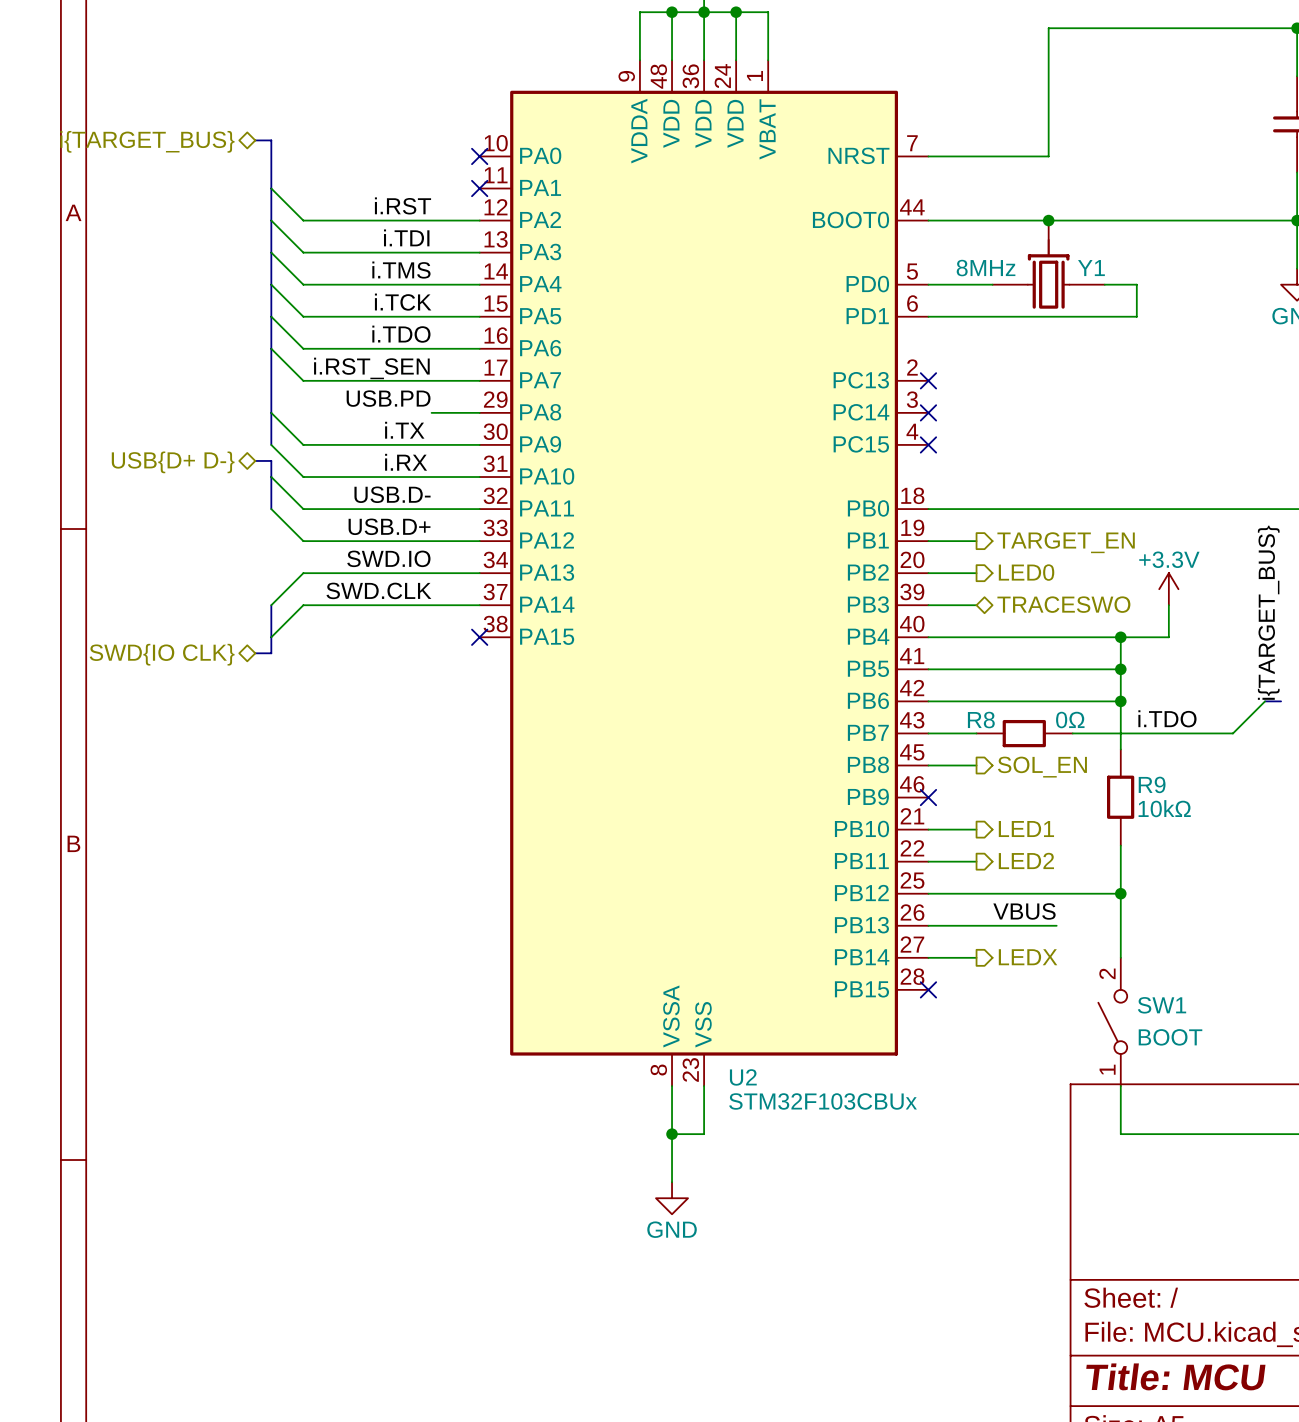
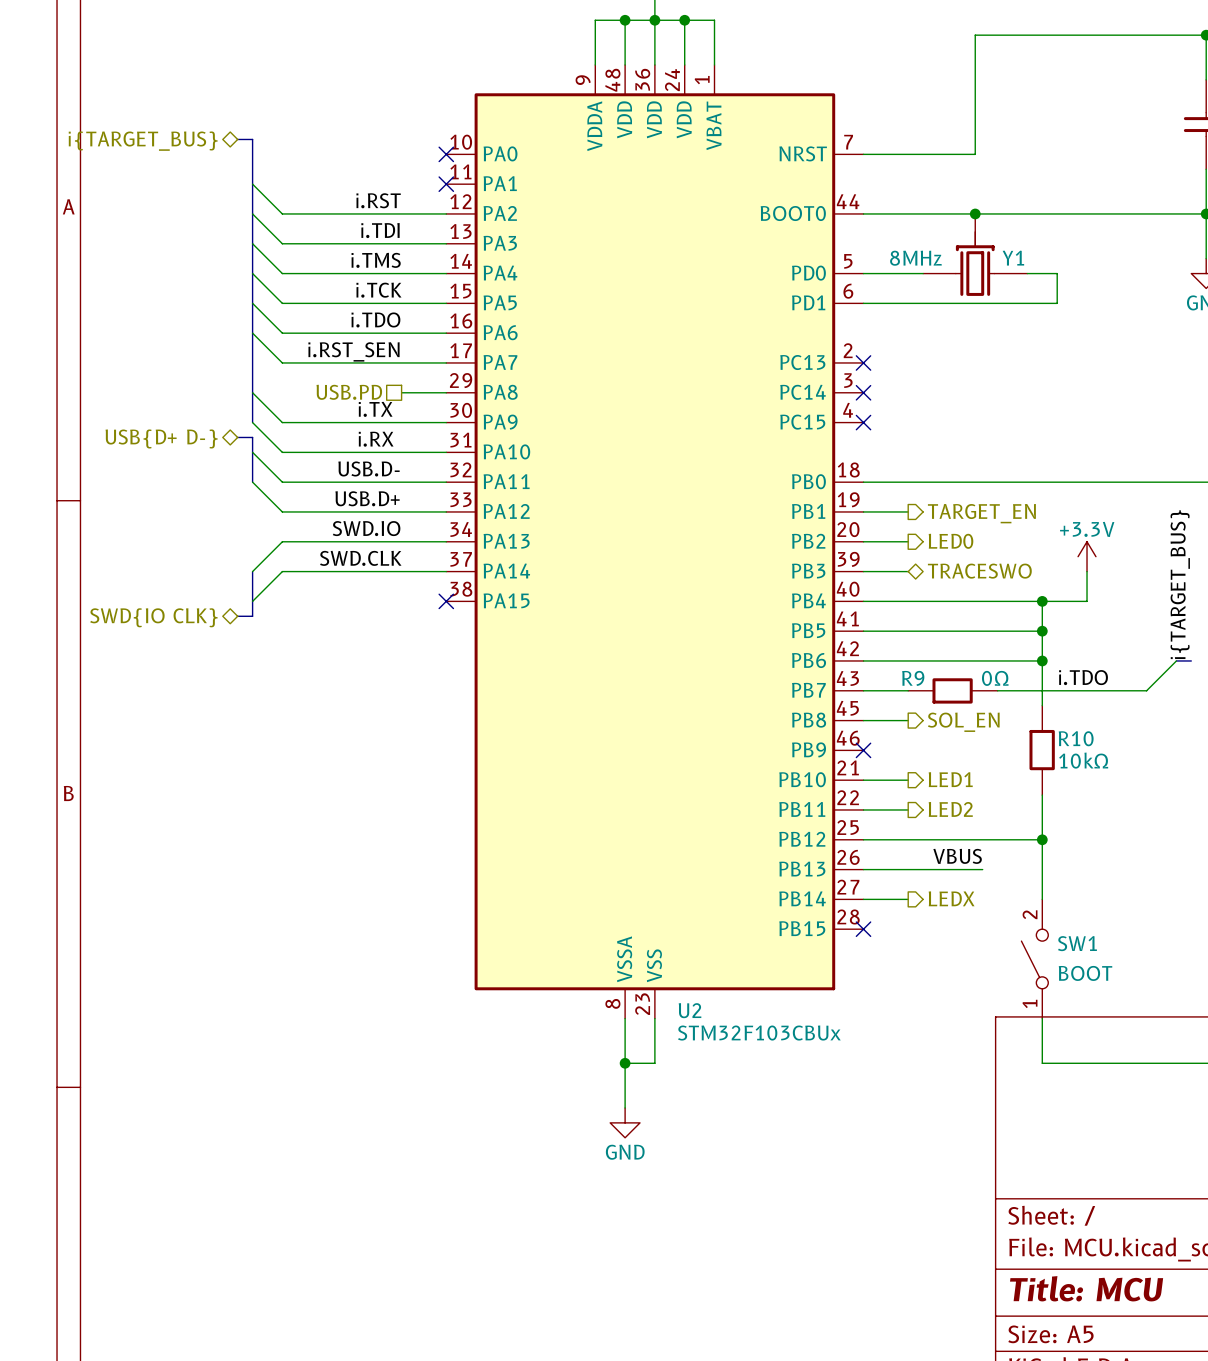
label: USB.PD (388, 398) -> none
hierarchical label: none -> USB.PD (349, 392)
R8 name: R8 (981, 720) -> R9 (913, 678)
R9 name: R9 (1152, 784) -> R10 (1076, 738)

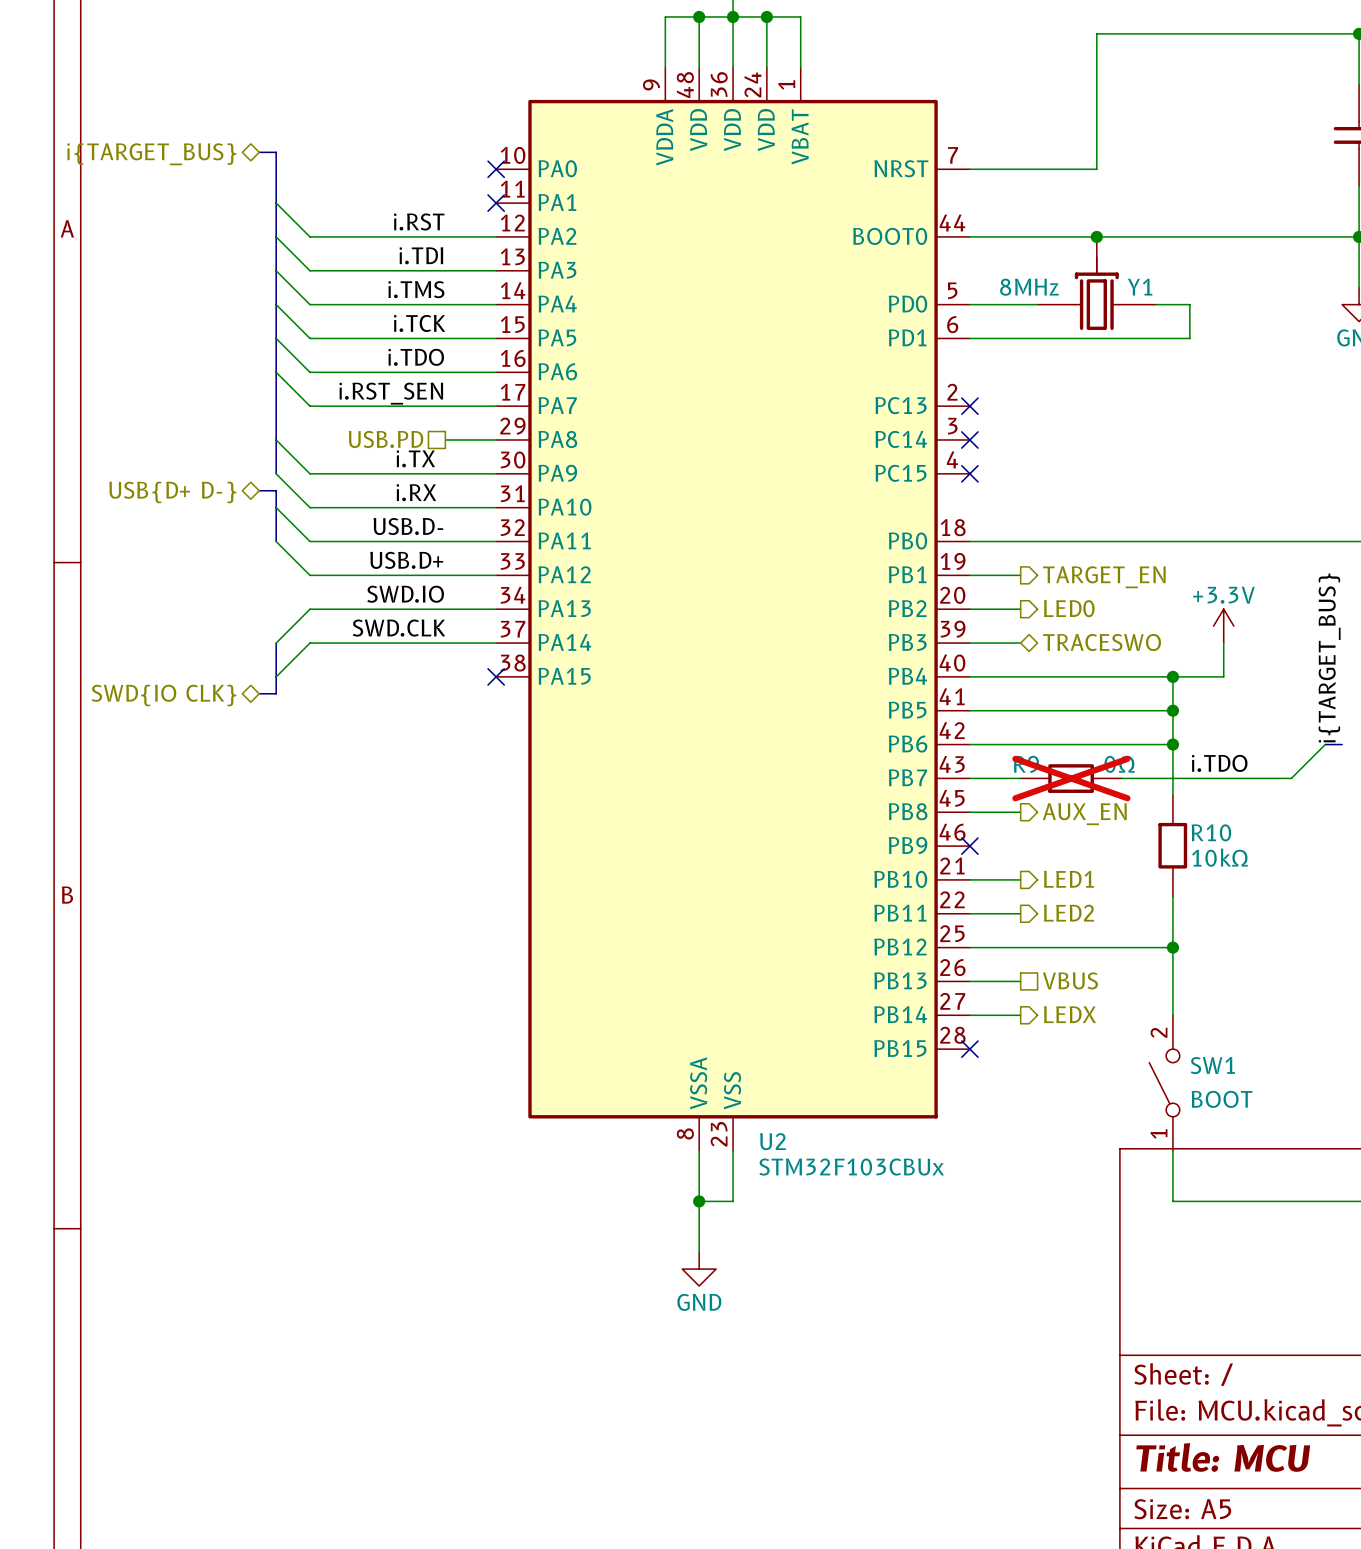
R9 do-not-place cross: none -> (1071, 778)
hierarchical label: SOL_EN (963, 722) -> AUX_EN (1084, 814)
label: VBUS (957, 856) -> none
wire: (908, 869) (982, 869) -> none
hierarchical label: none -> VBUS (1070, 980)

